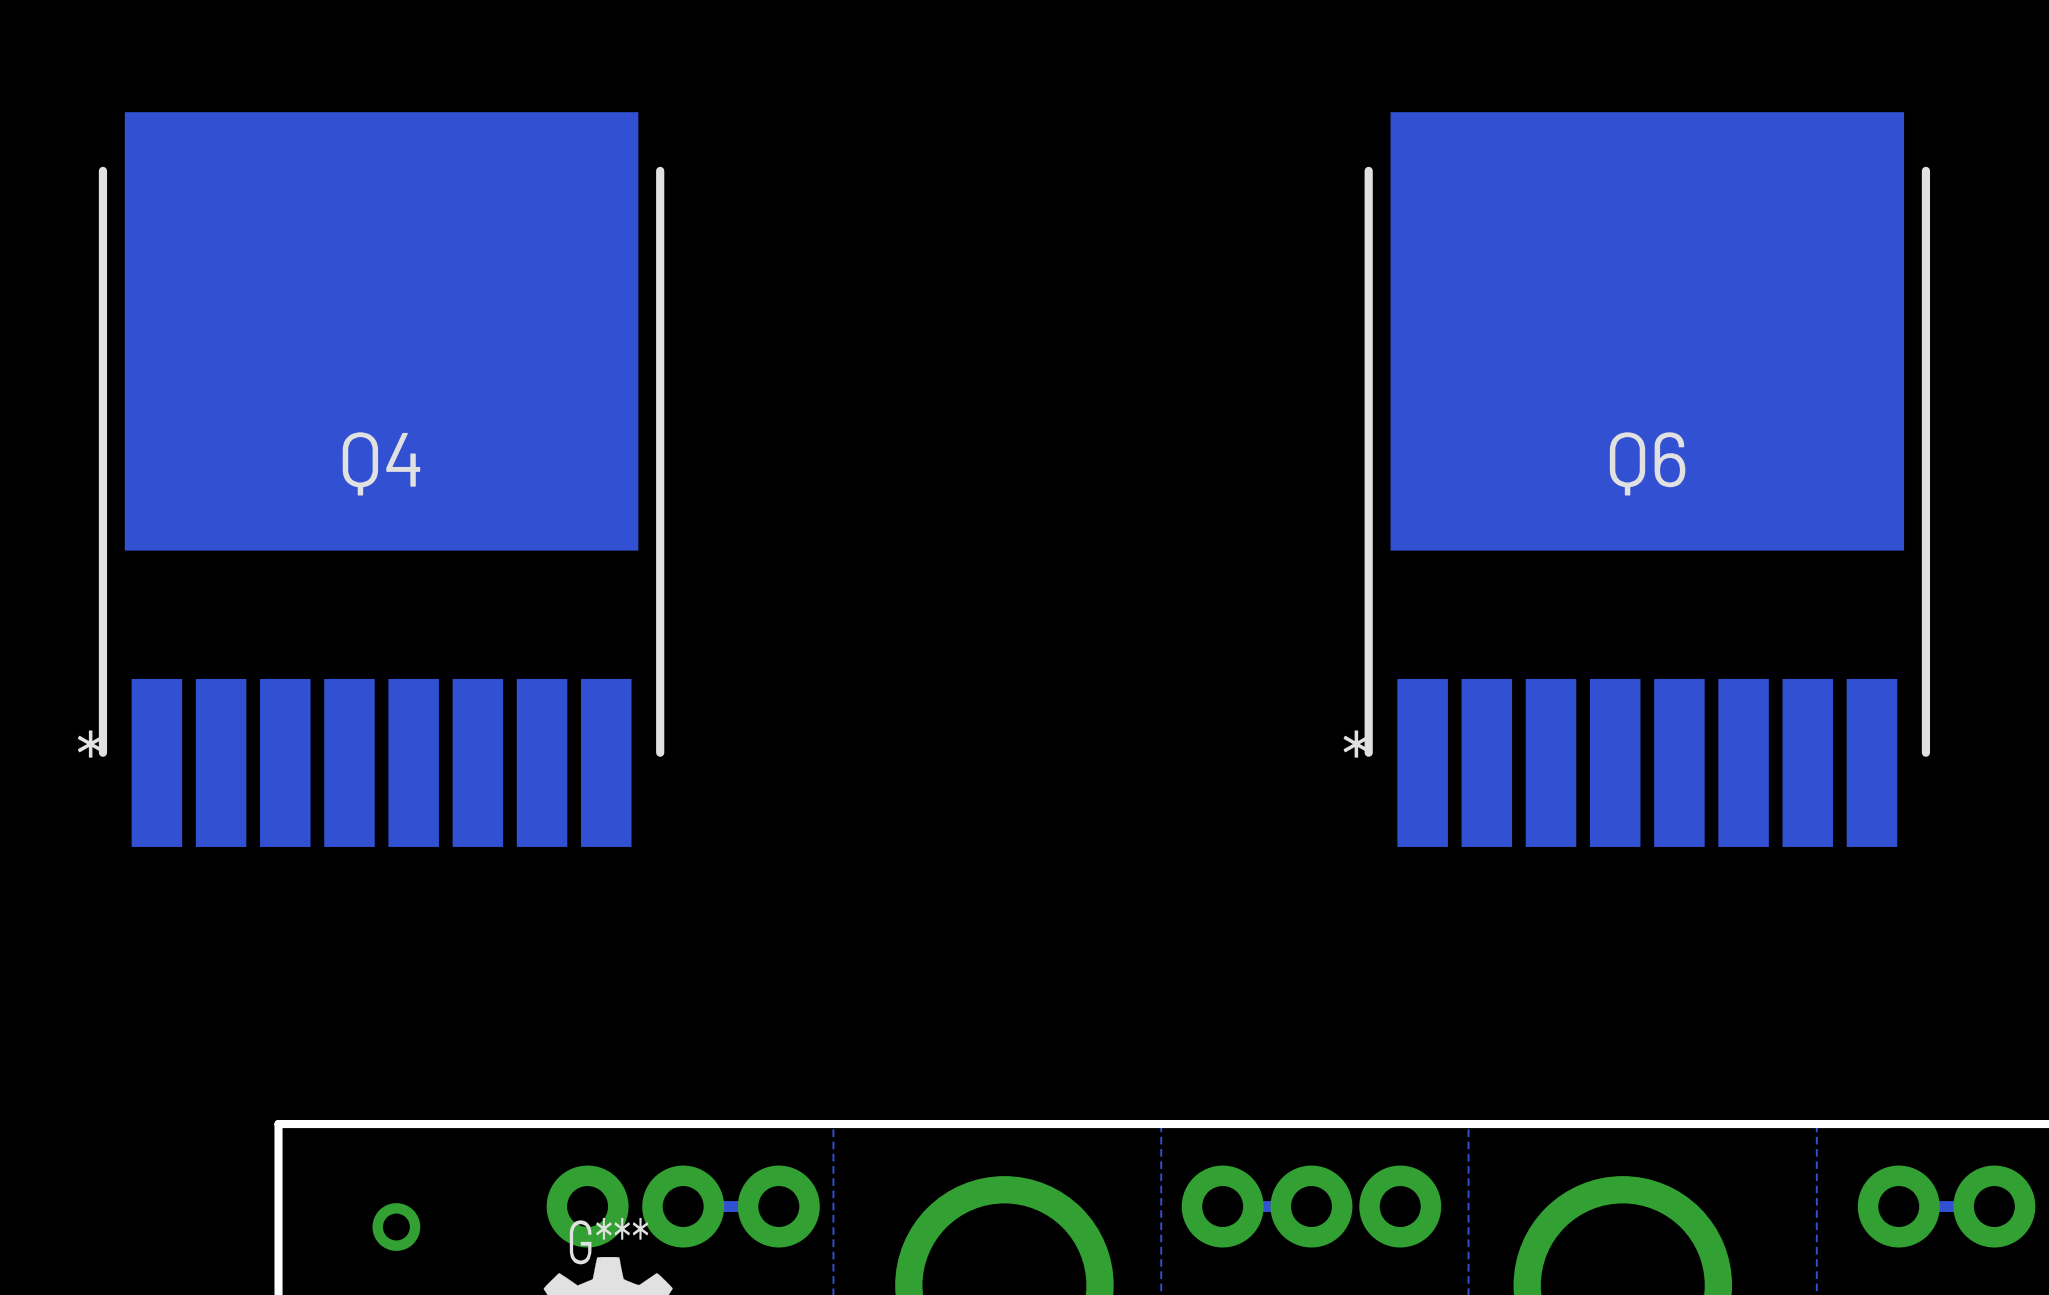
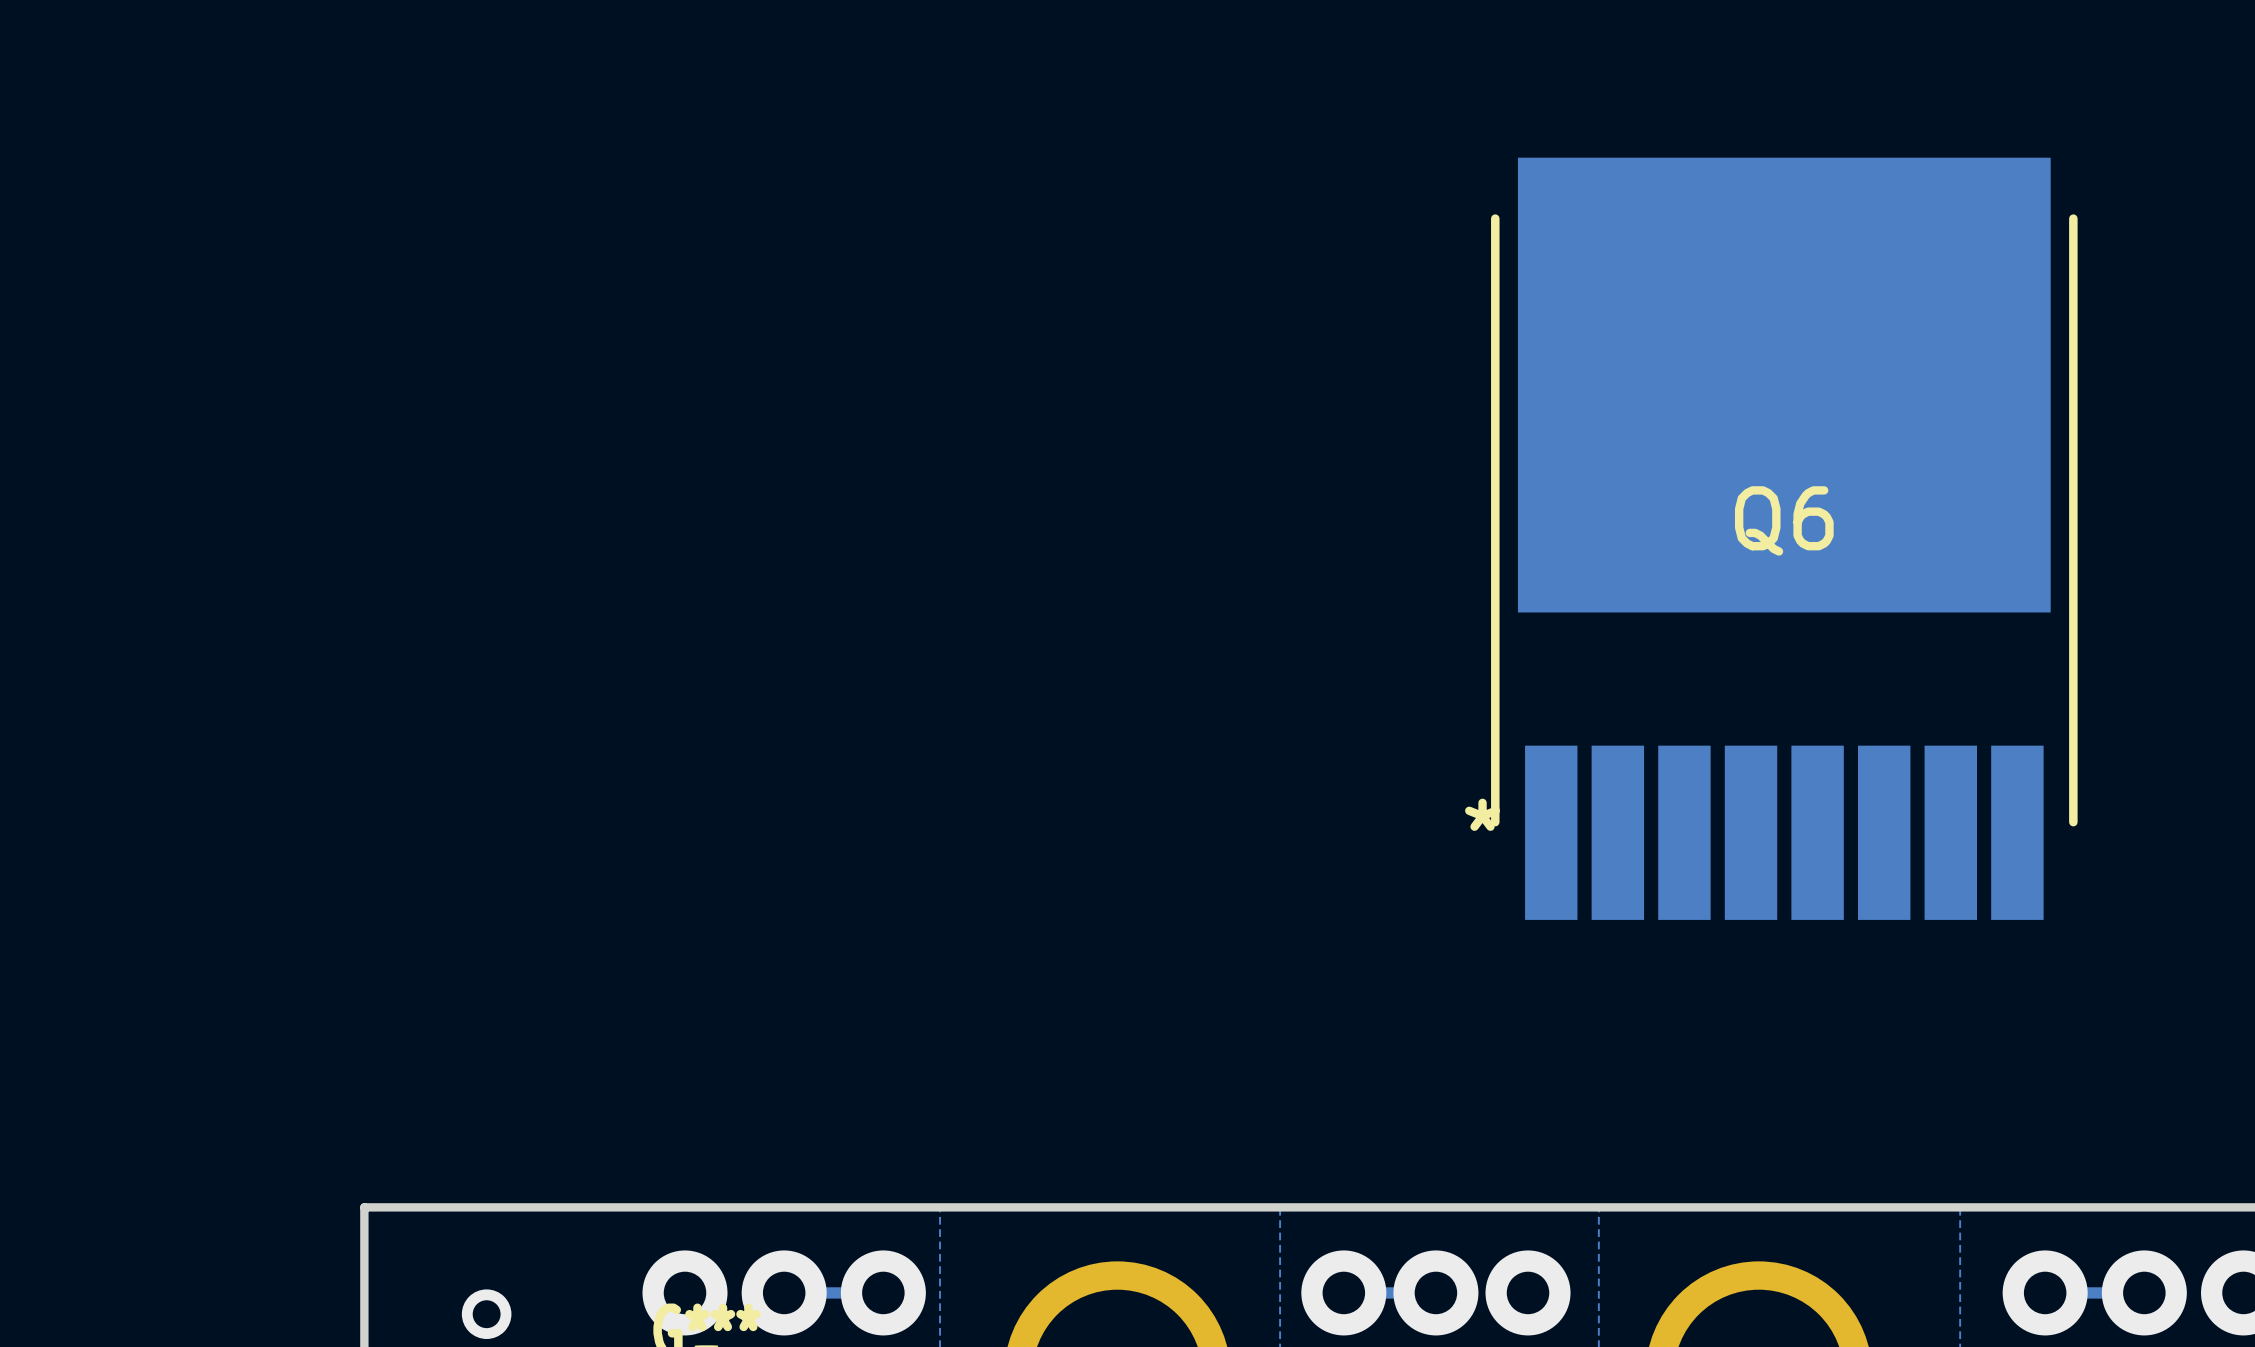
Q4: (381, 479) -> none

